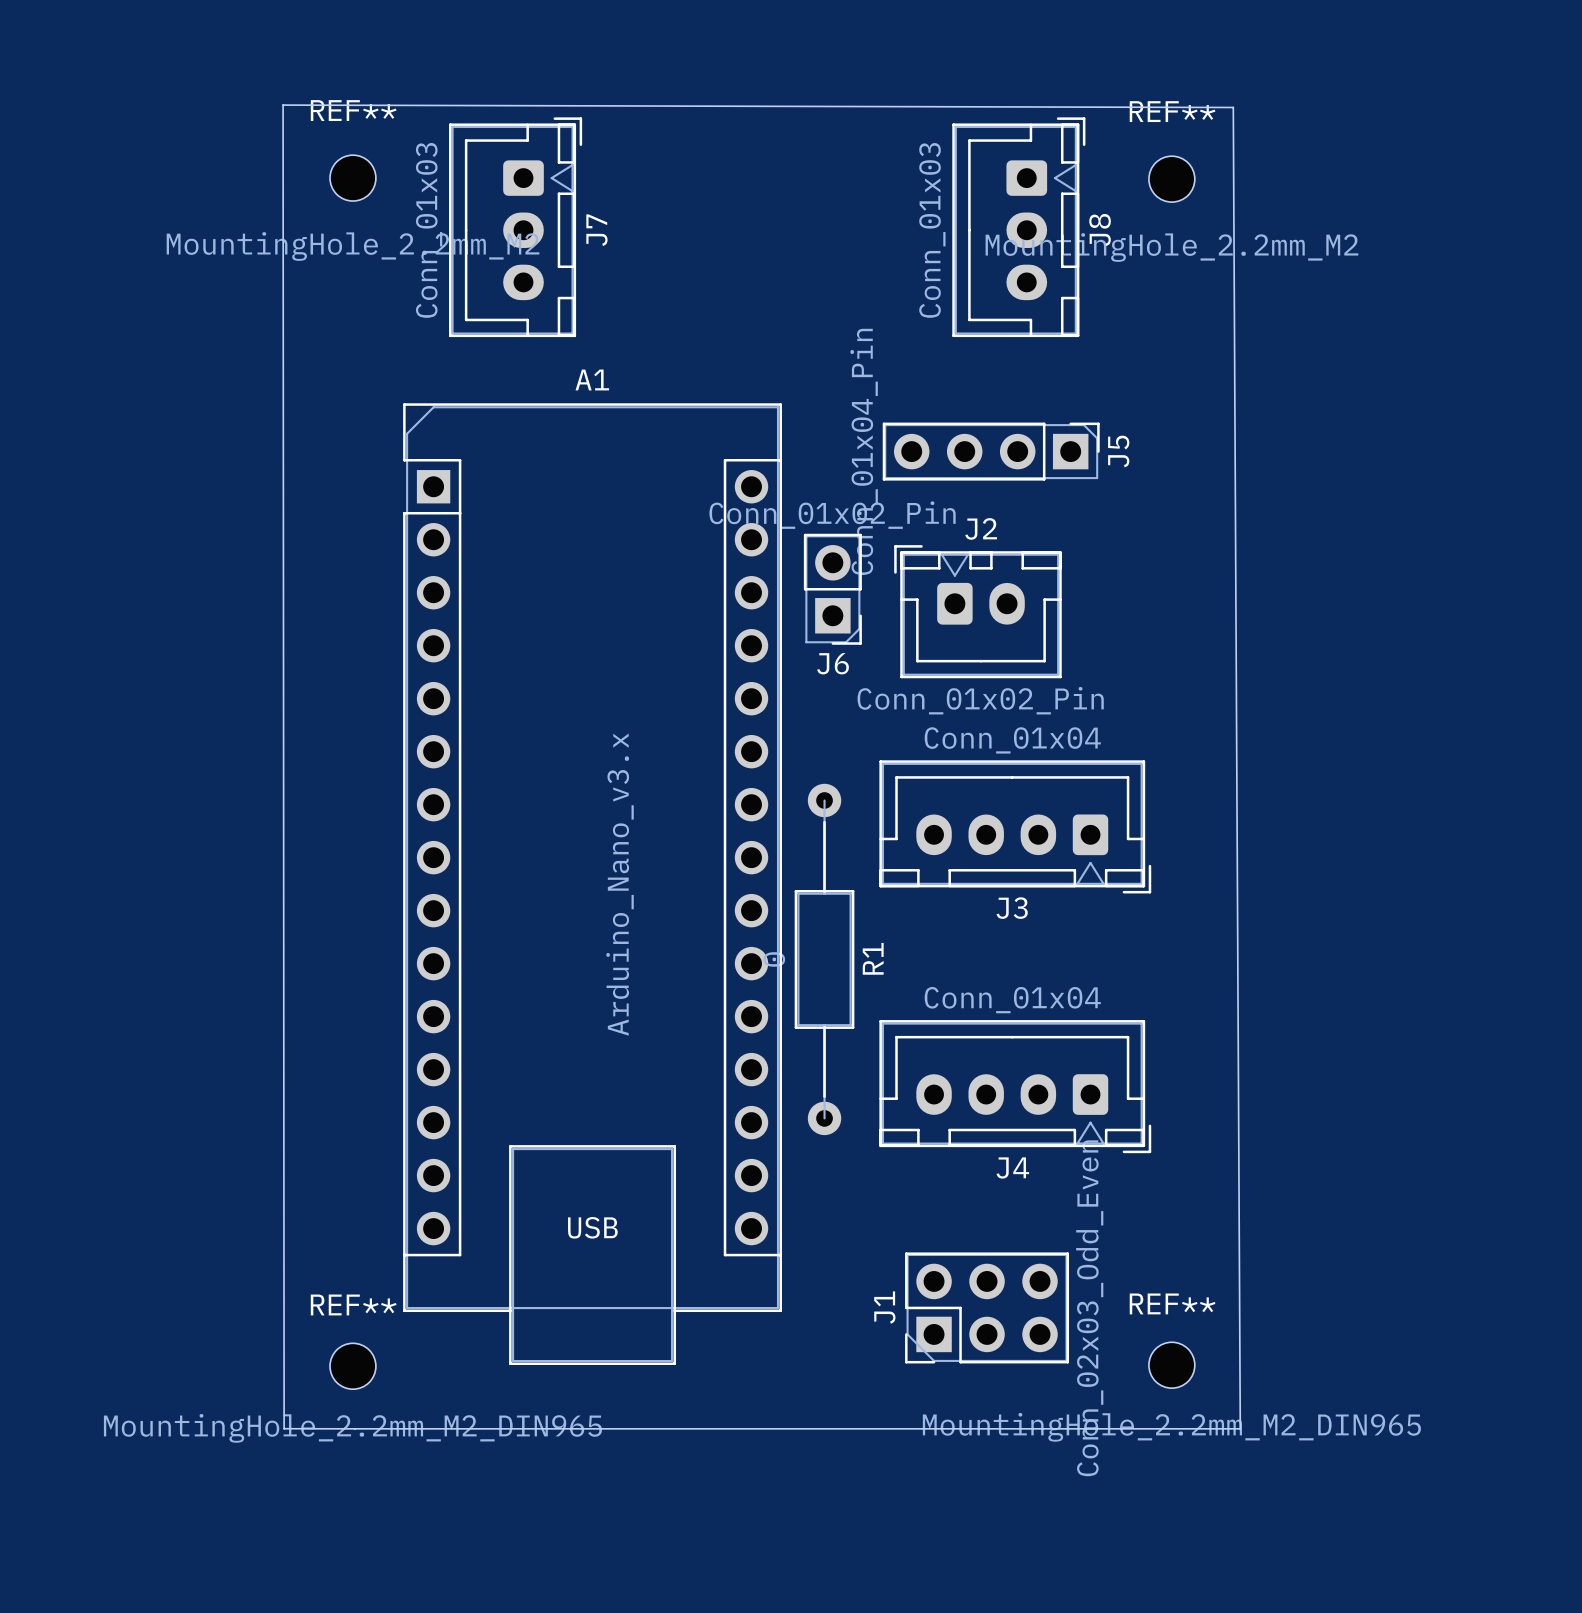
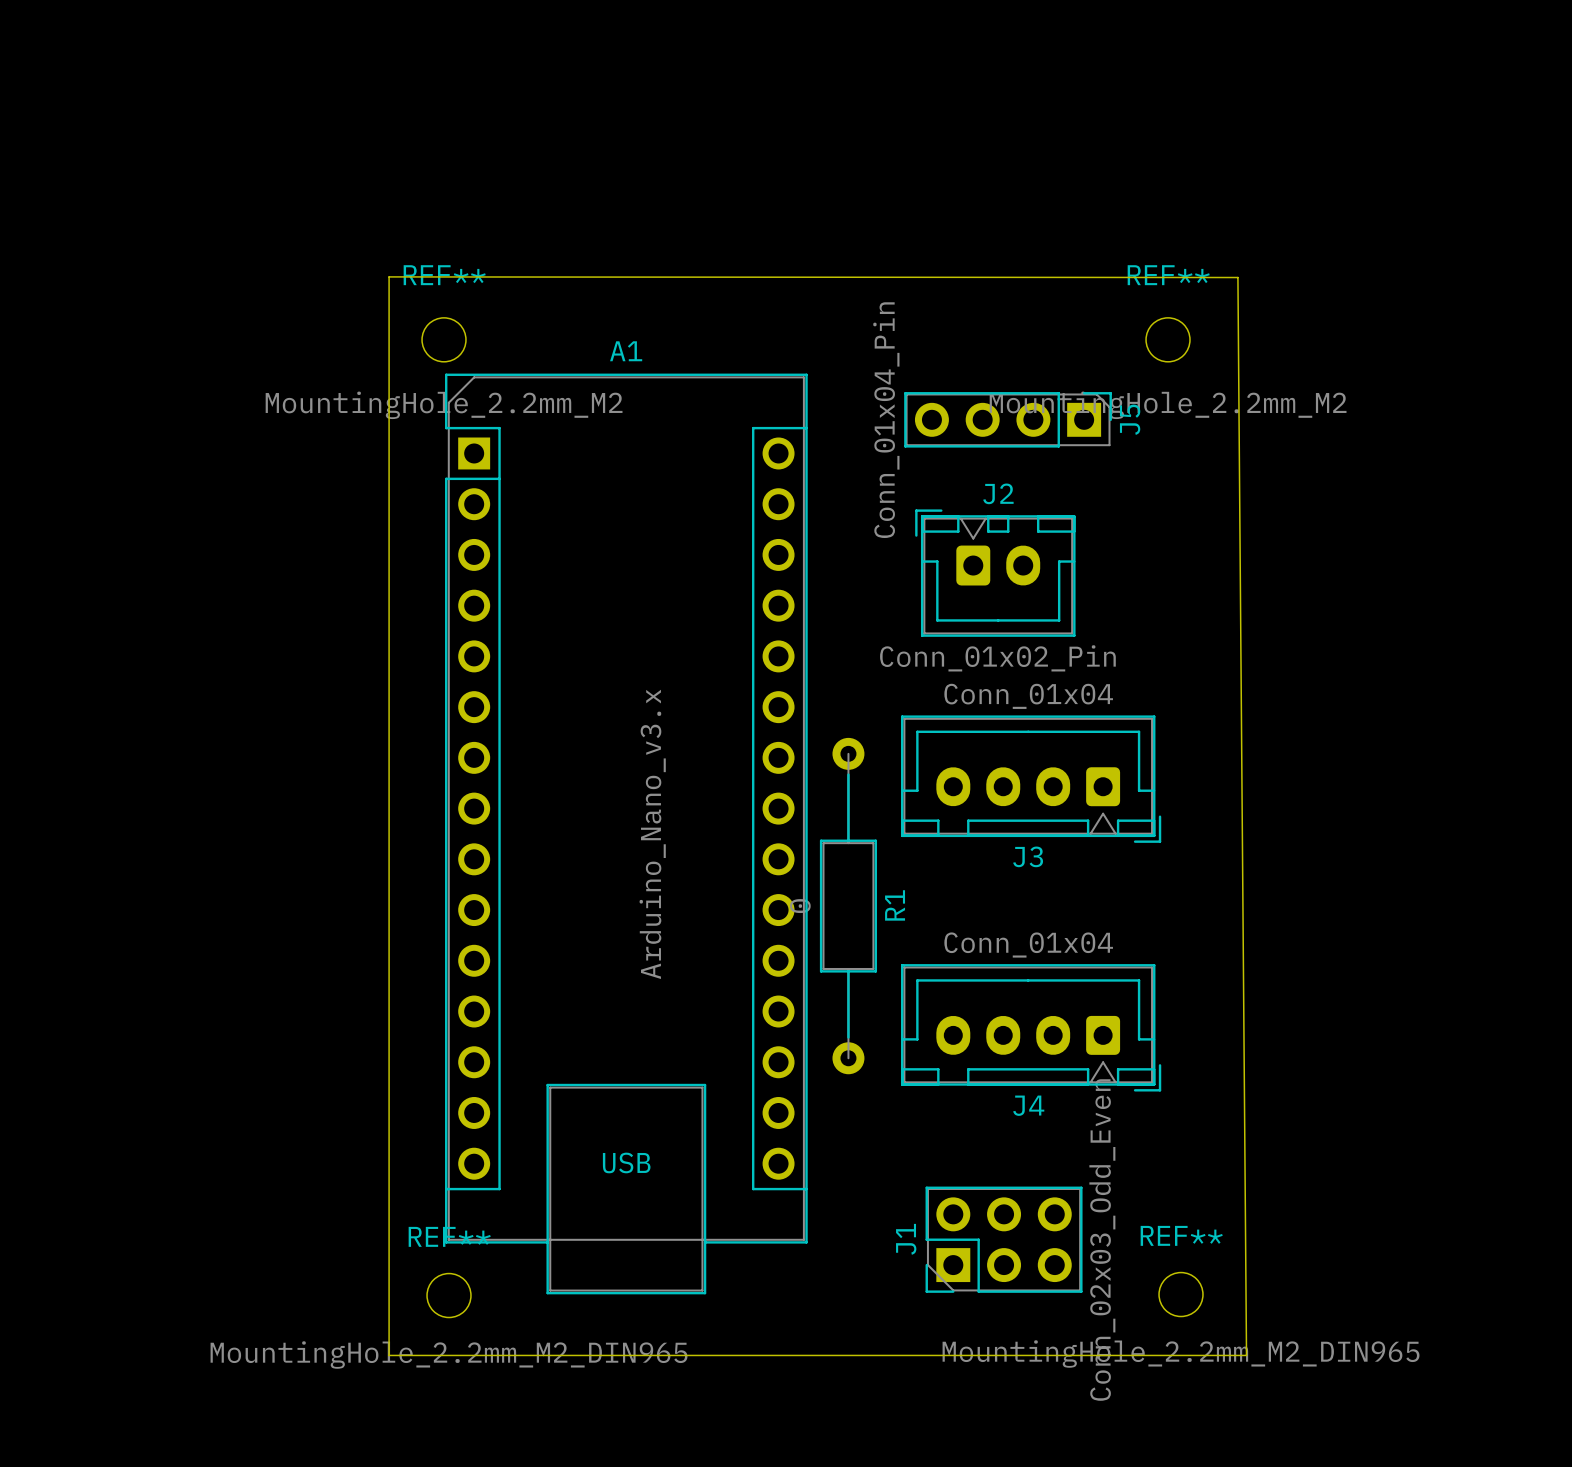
REF** position: (352, 178) -> (444, 339)
REF** position: (1171, 179) -> (1168, 339)
J7: Conn_01x03 (515, 227) -> none
J8: Conn_01x03 (1018, 227) -> none
J6: Conn_01x02_Pin (832, 589) -> none
REF** position: (352, 1366) -> (449, 1295)
board edge: (355, 1428) (284, 1428) (283, 105) (1233, 107) (1240, 1428) -> (399, 1355) (389, 1355) (389, 276) (1237, 277) (1246, 1355)

